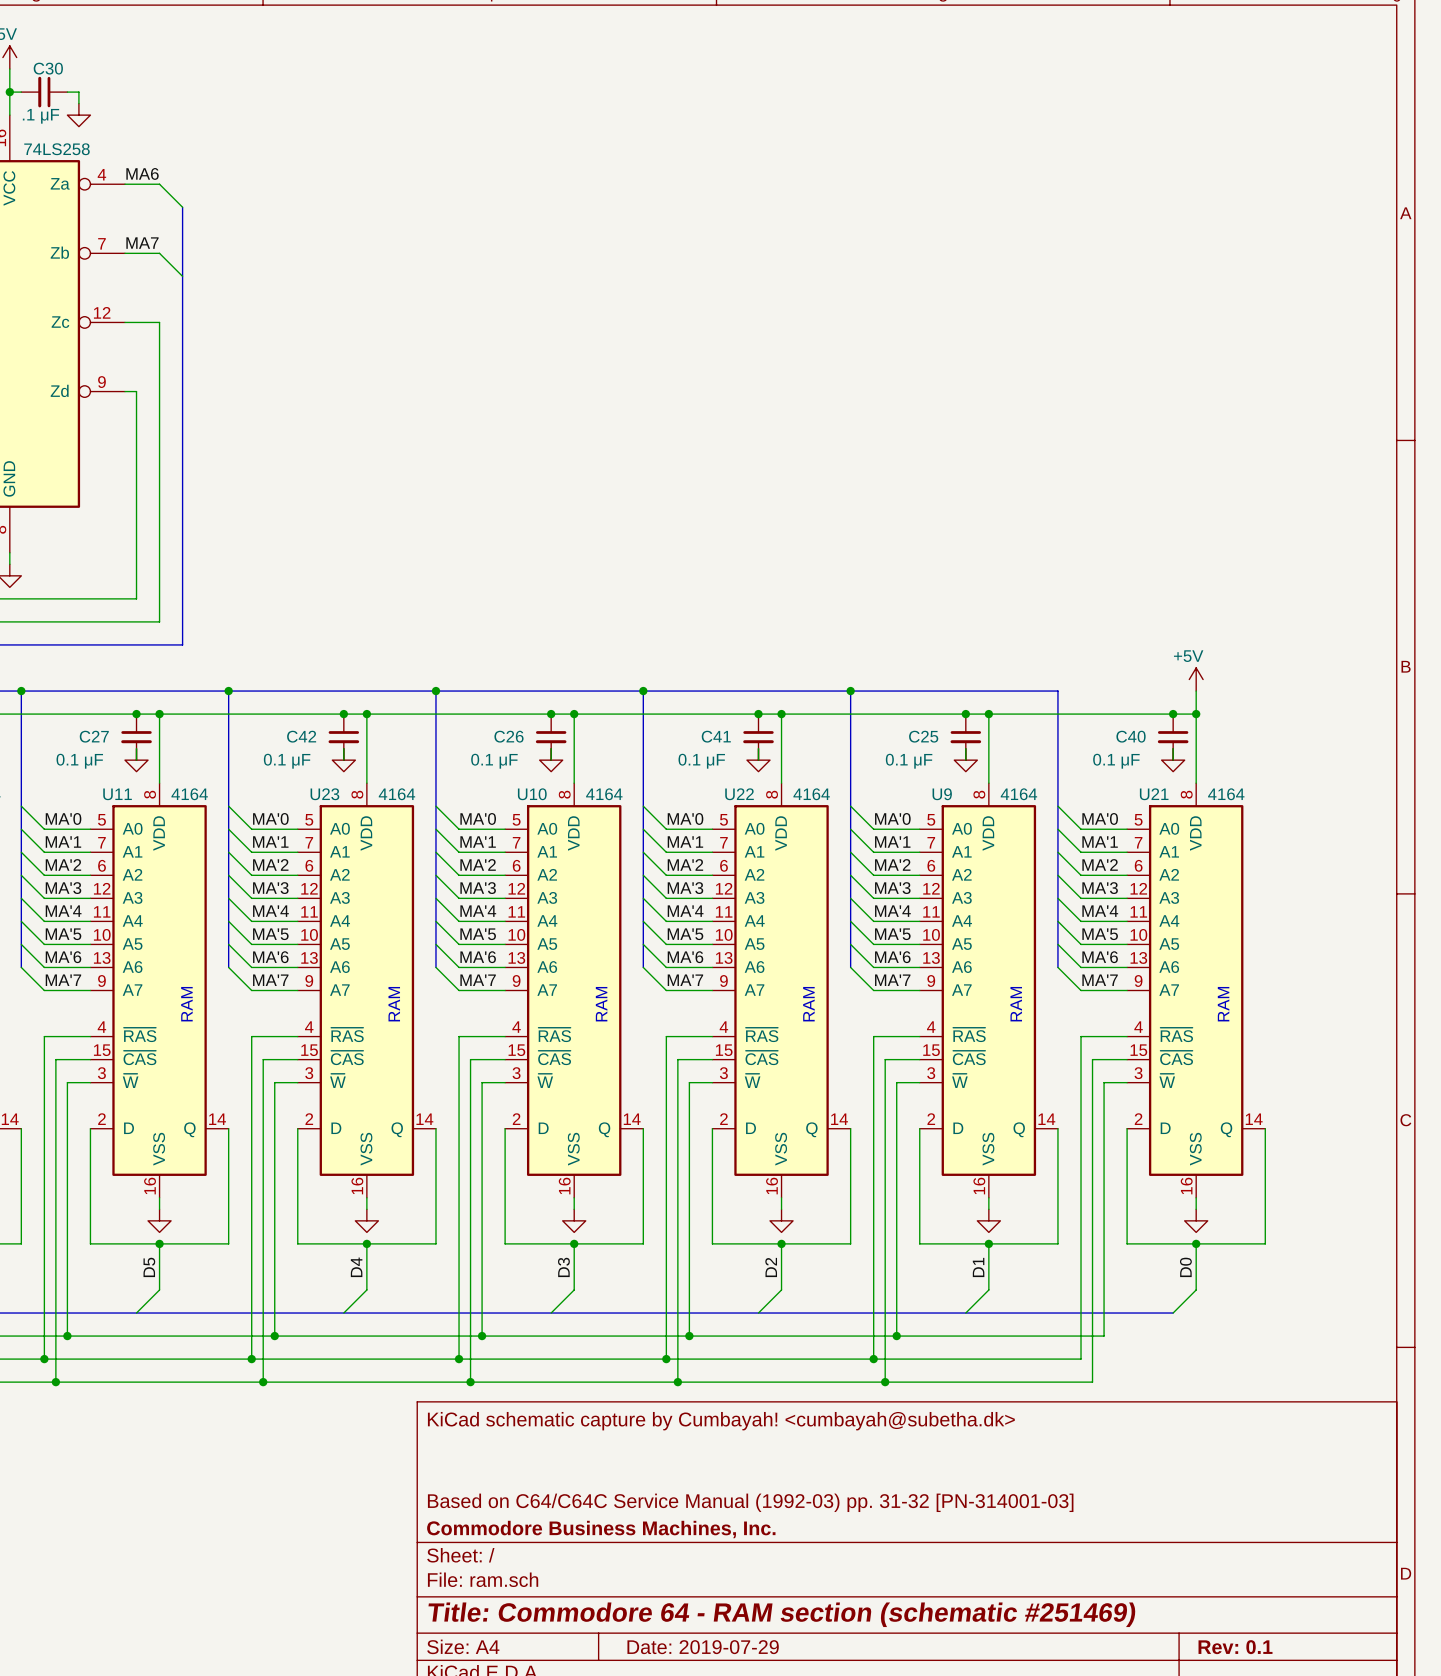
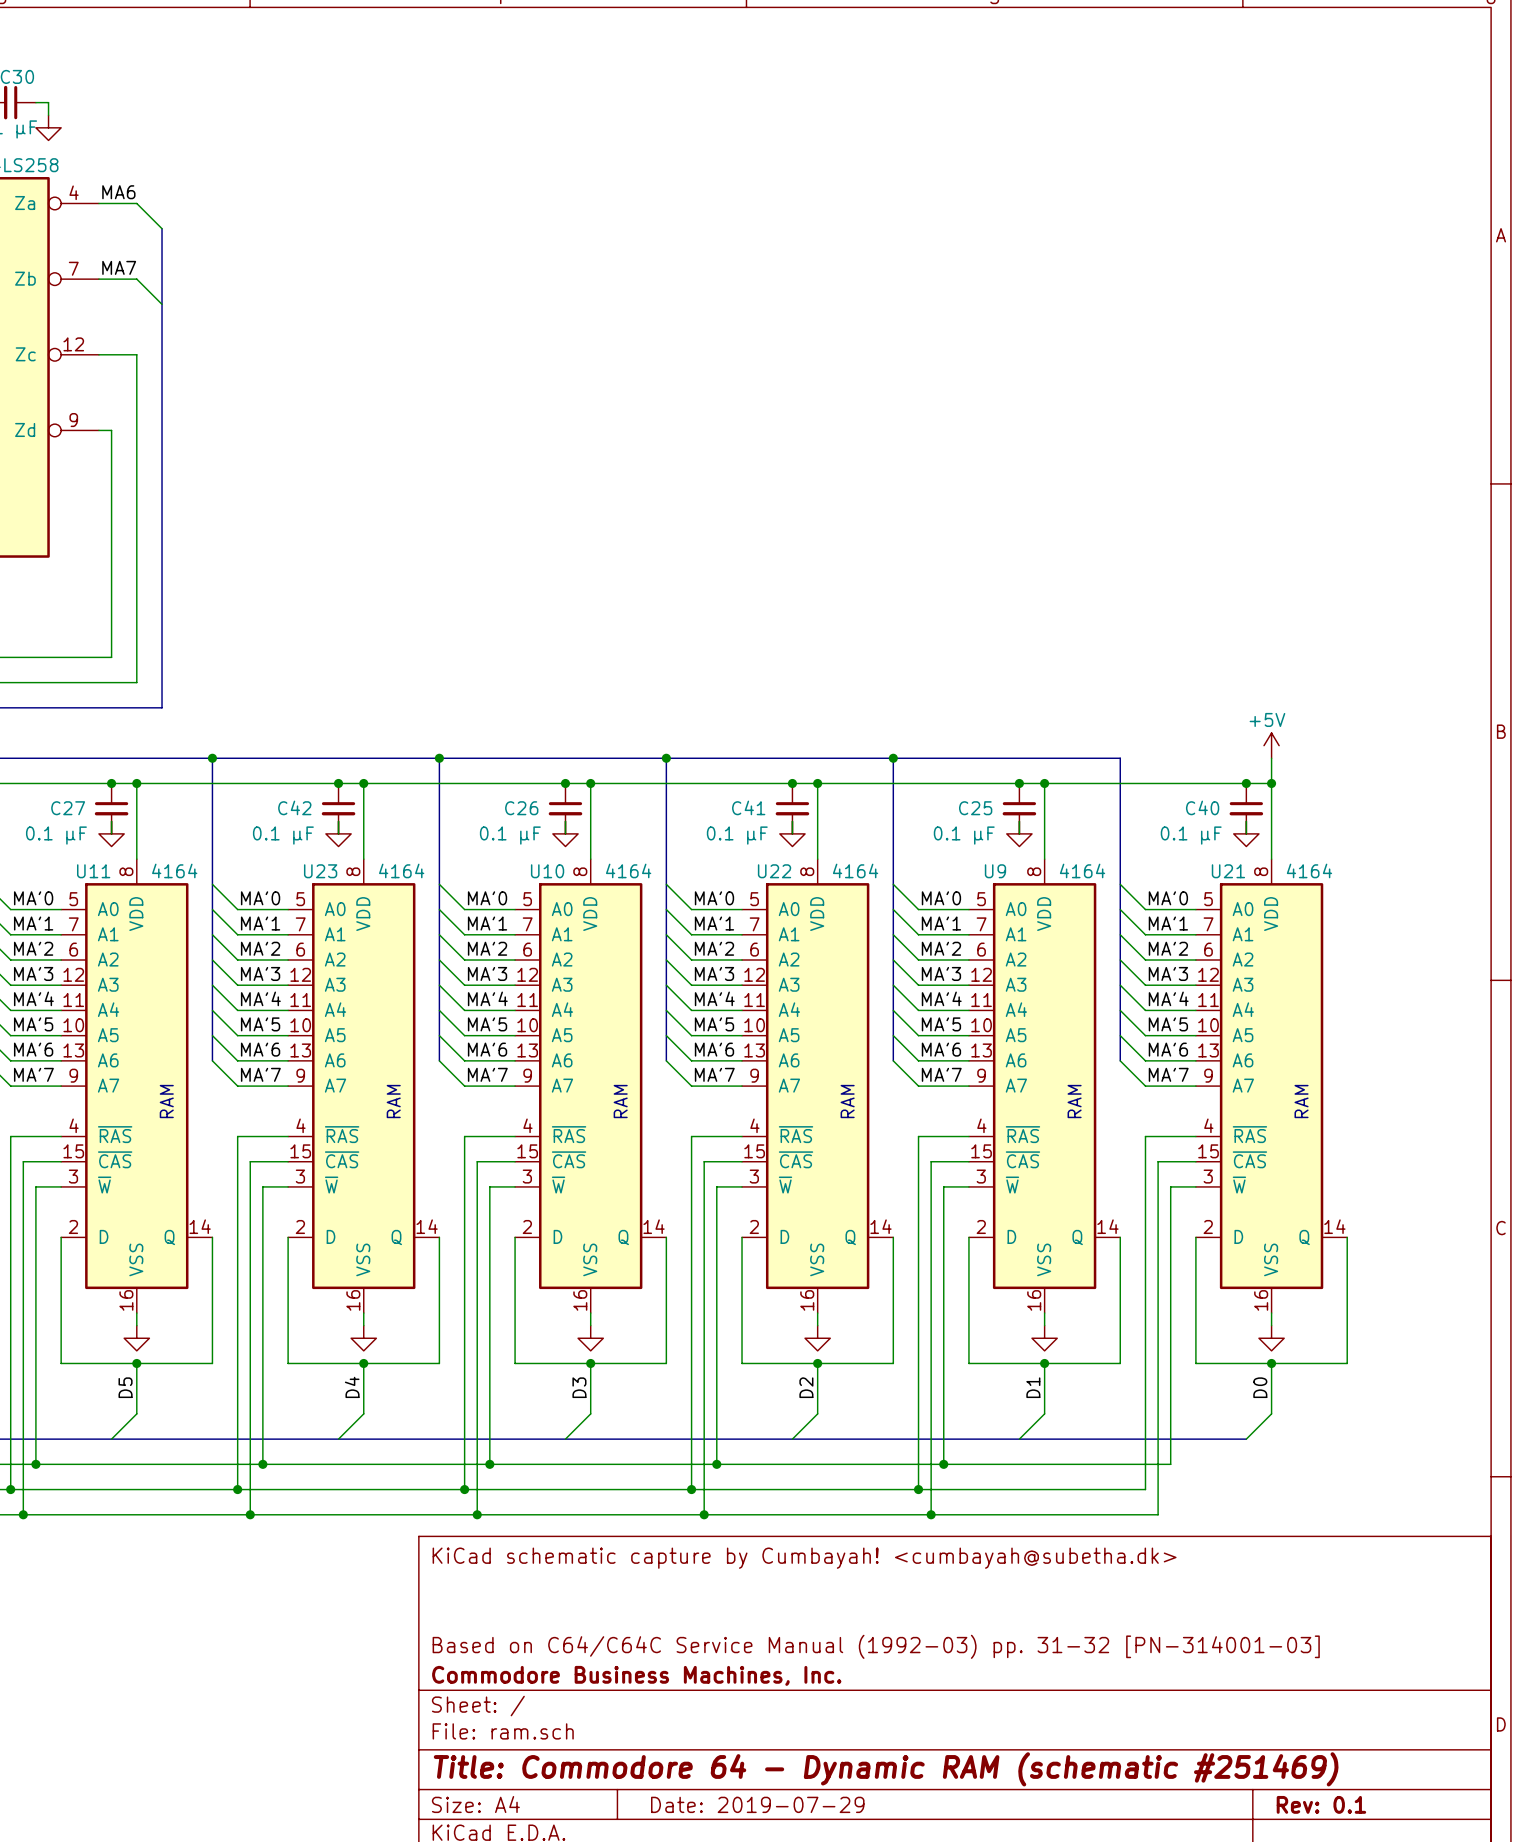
title block: Title: Commodore 64 - RAM section (schematic #251469) (781, 1614) -> Title: Commodore 64 - Dynamic RAM (schematic #251469) (886, 1769)

